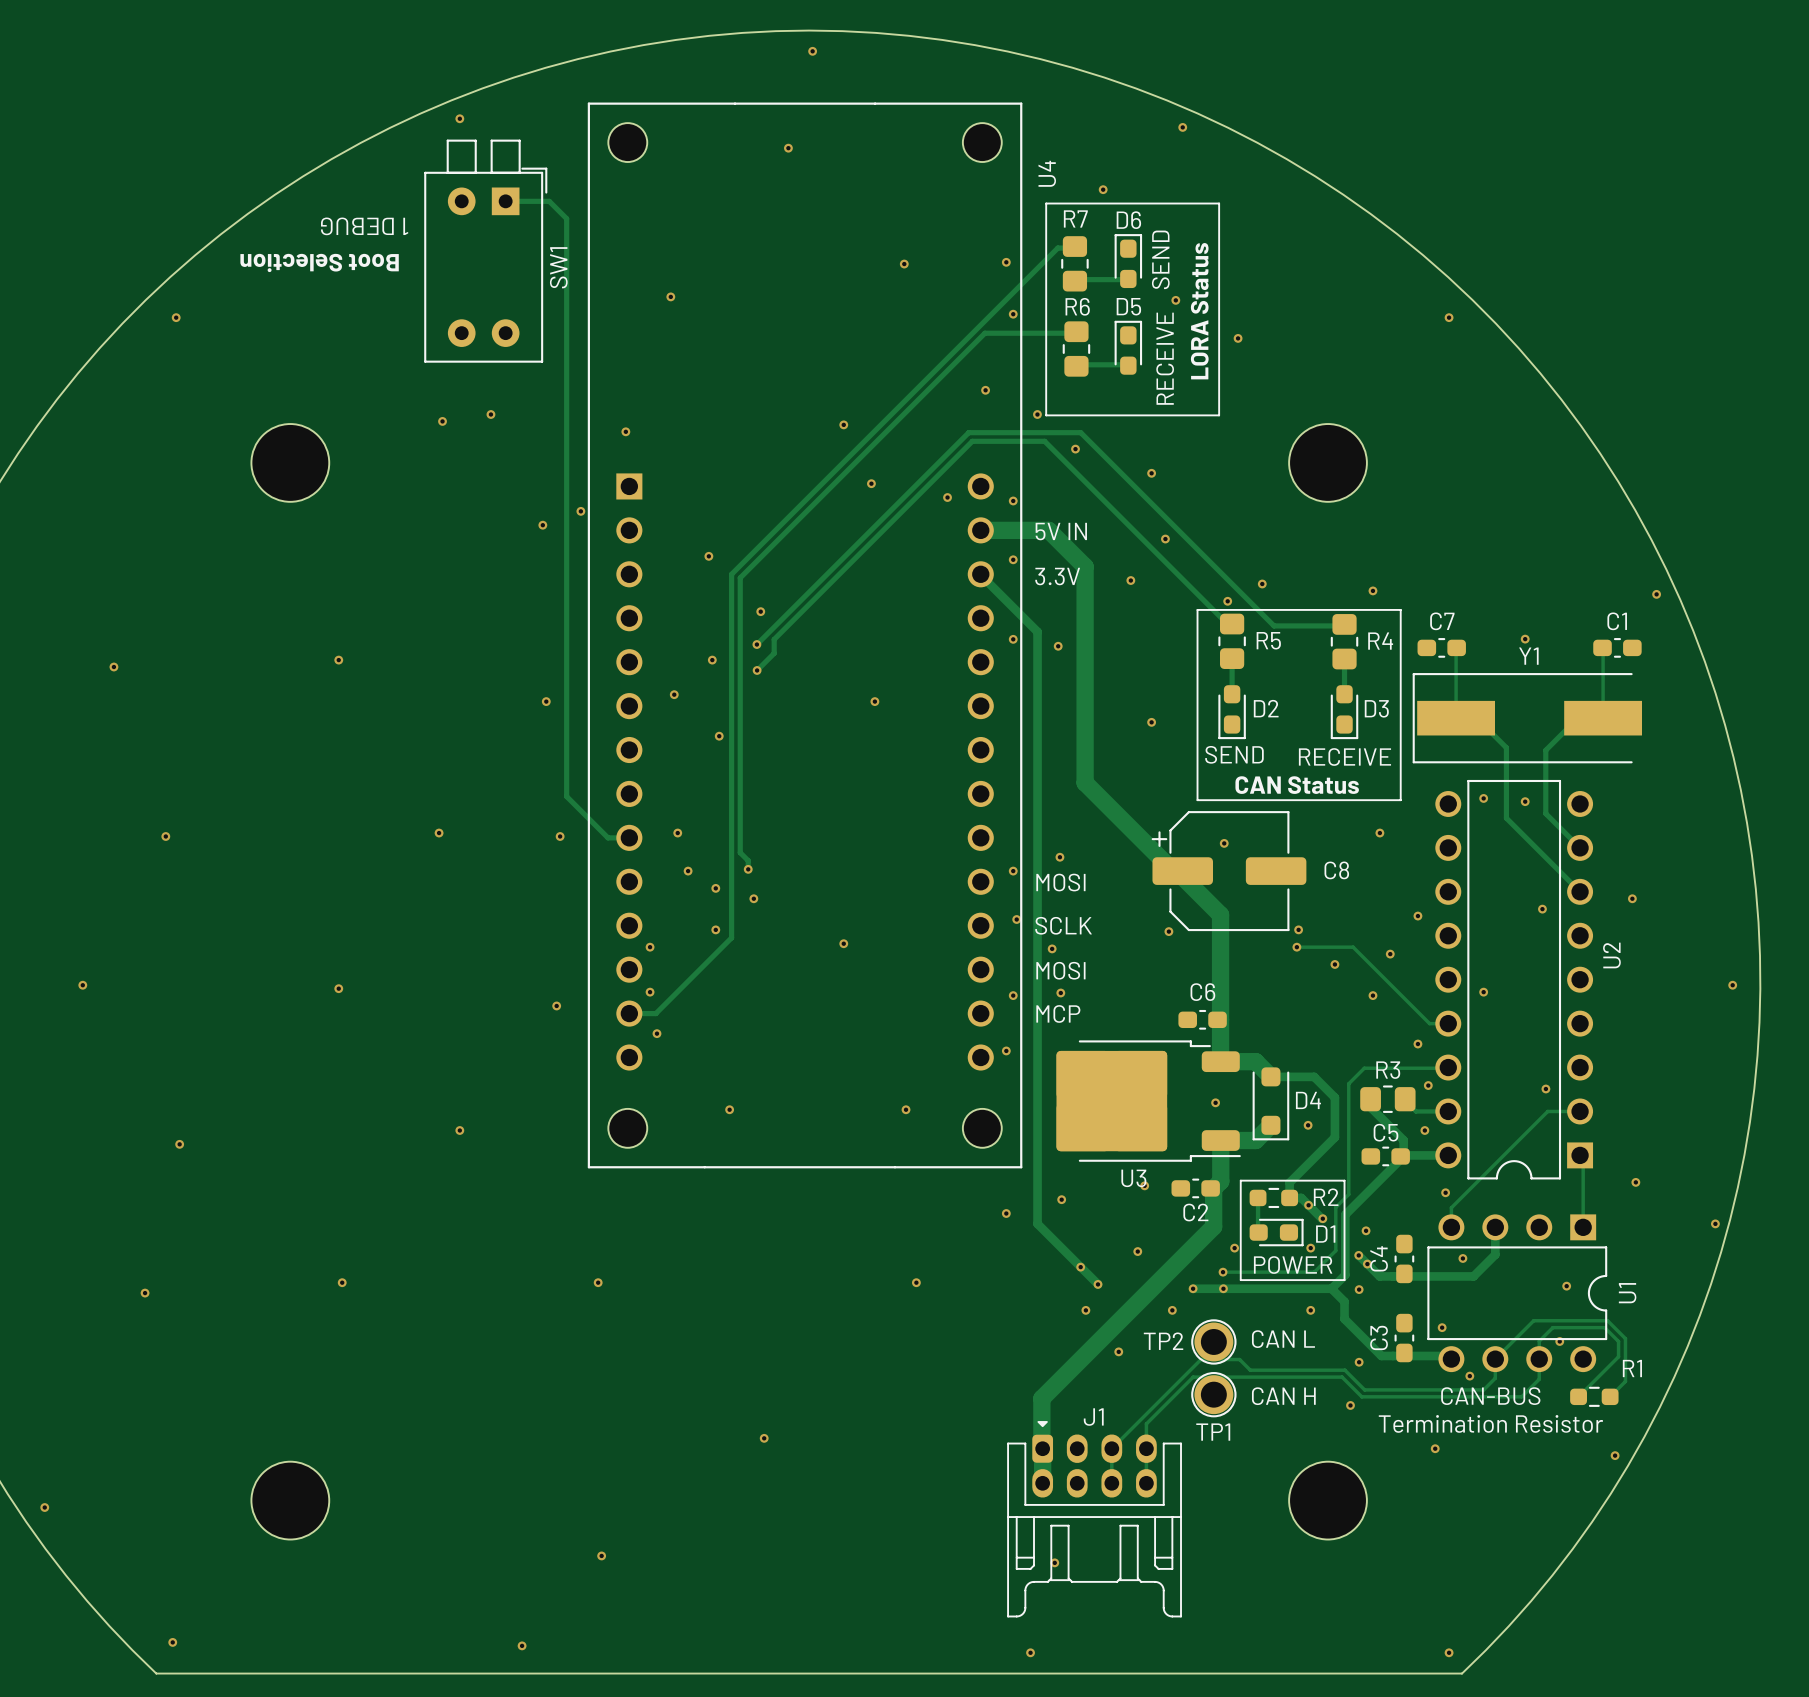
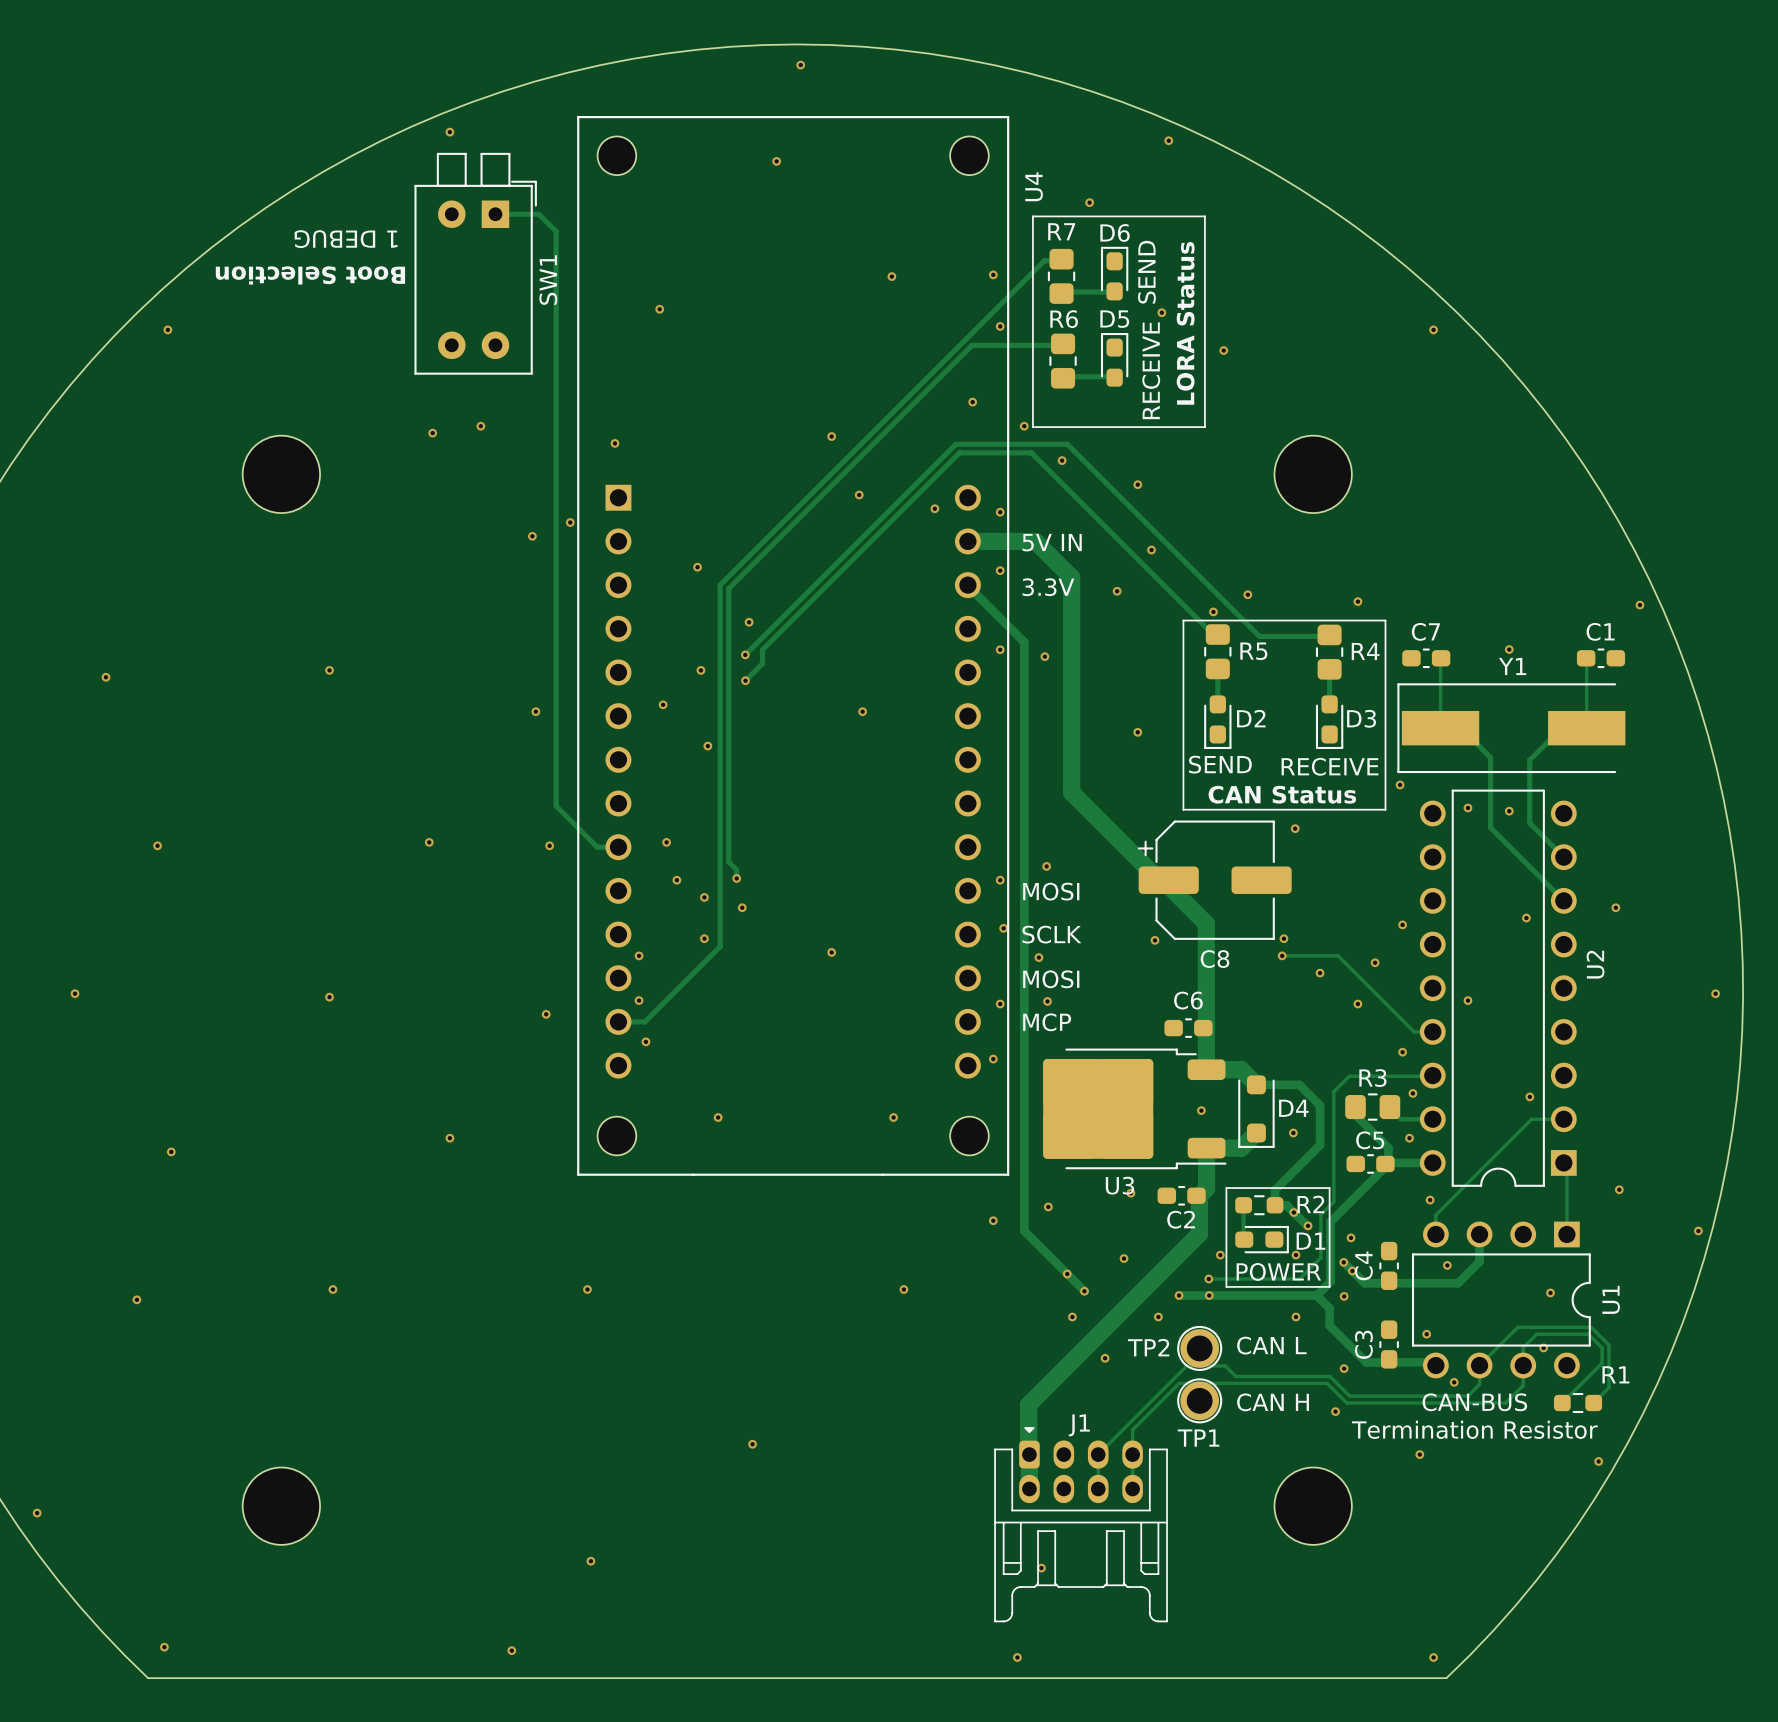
via: none -> (1400, 784)
via: none -> (1295, 828)
via: (1379, 833) -> none
via: (1224, 843) -> none
C8 name position: C8 (1336, 870) -> C8 (1215, 959)

